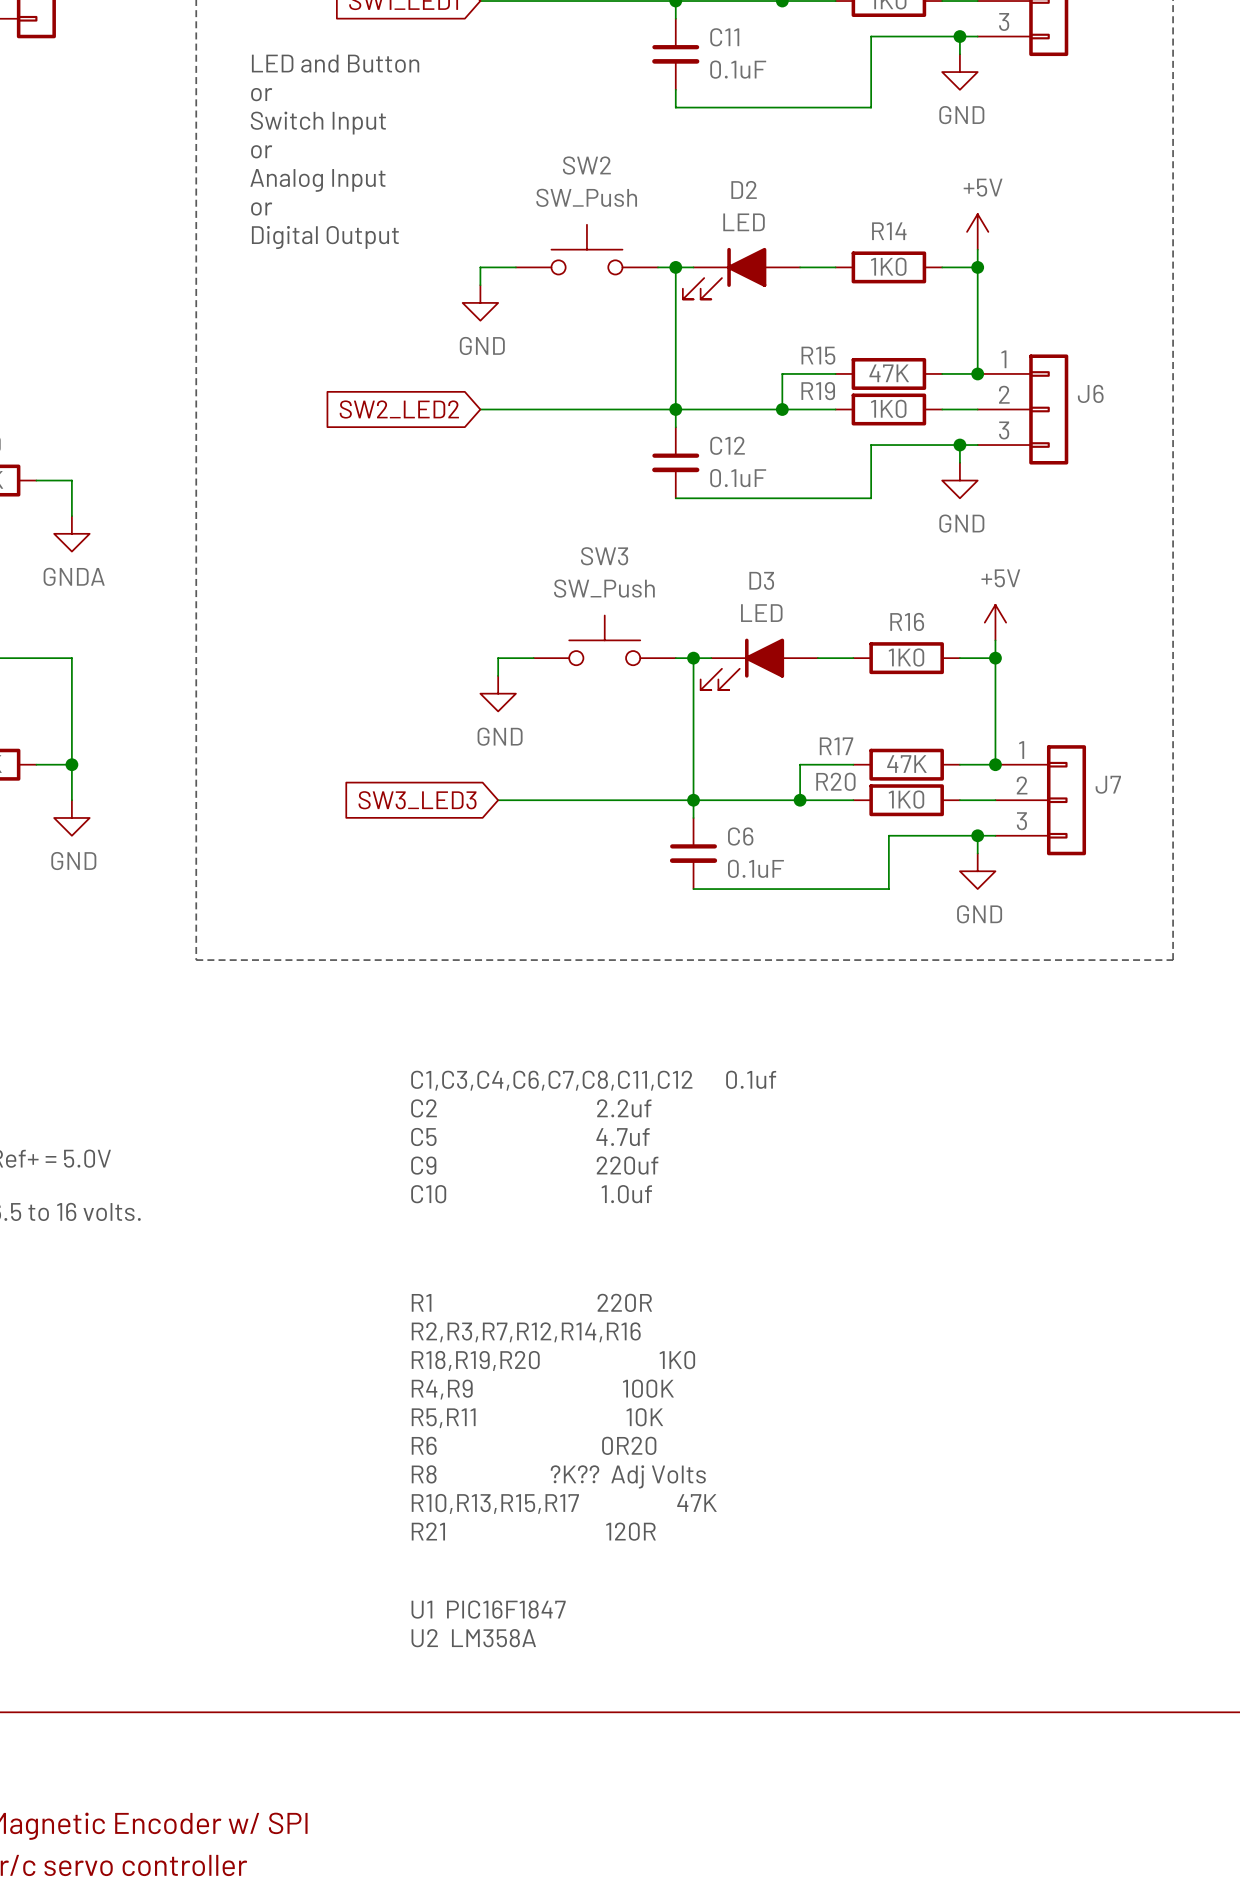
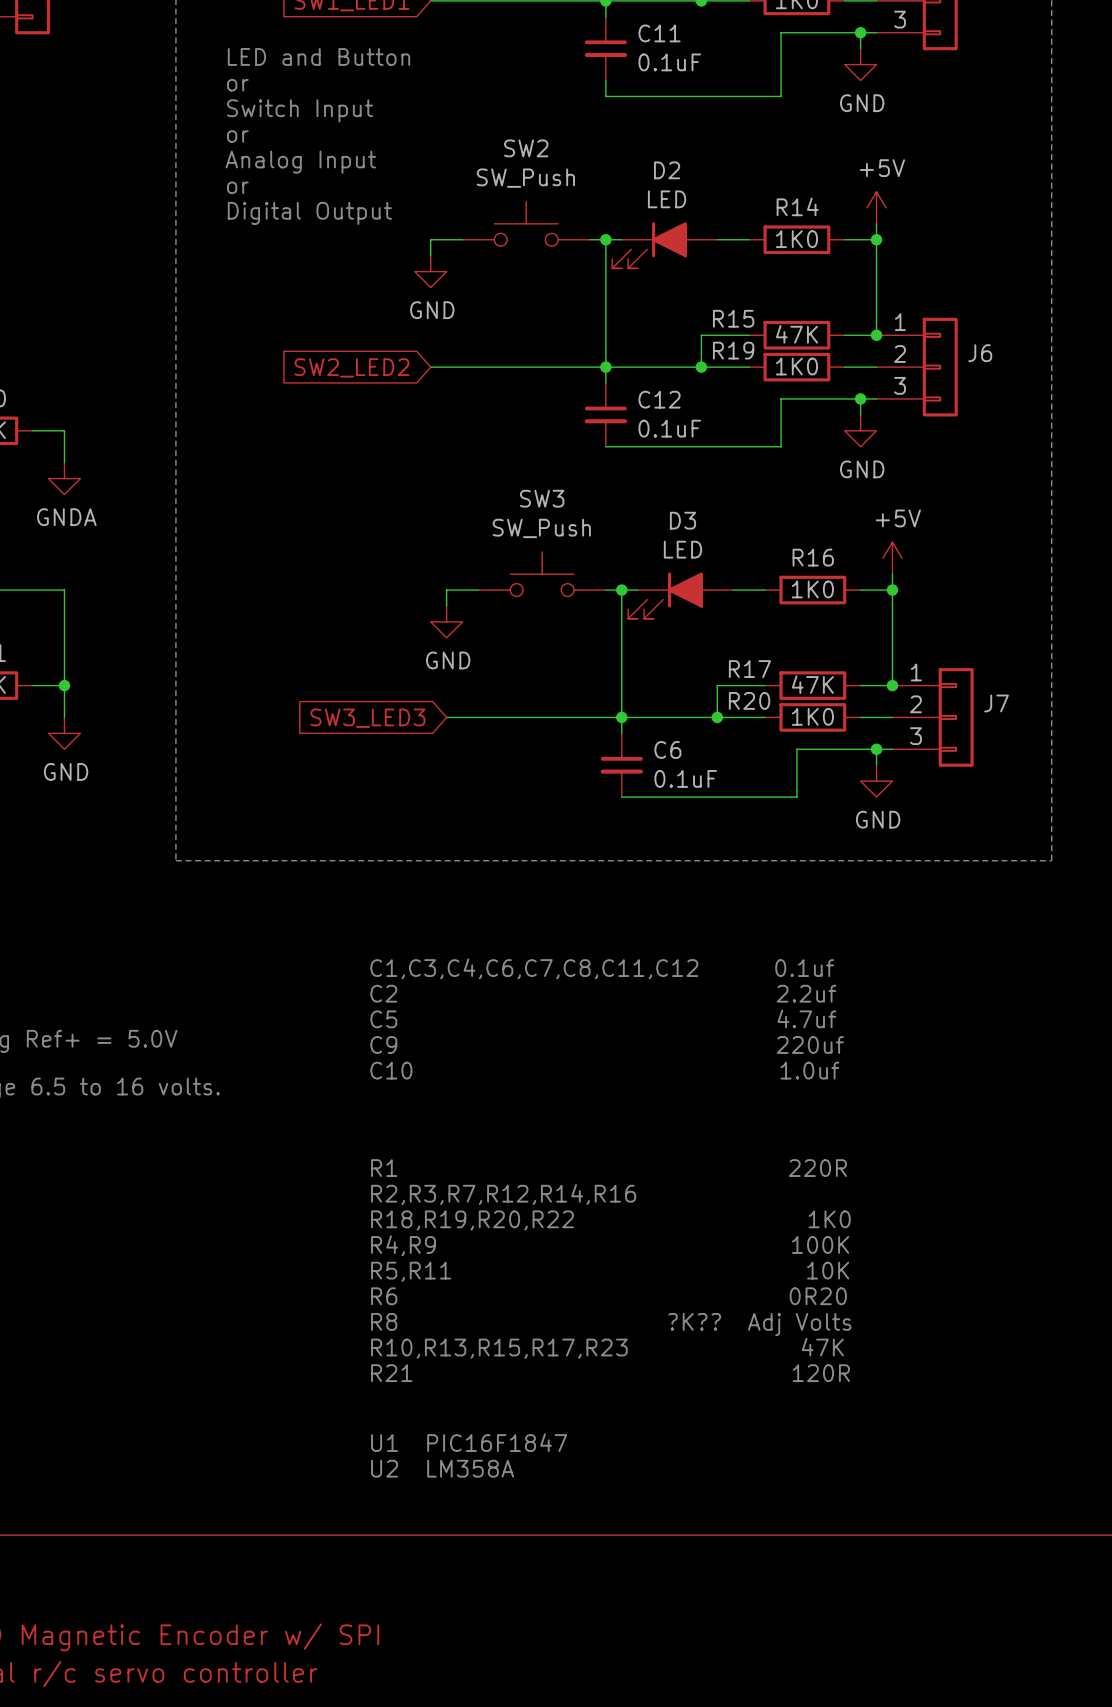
text: R18,R19,R20 1K0 (553, 1360) -> R18,R19,R20,R22 1K0 (610, 1220)
text: R10,R13,R15,R17 47K (564, 1503) -> R10,R13,R15,R17,R23 47K (607, 1348)

